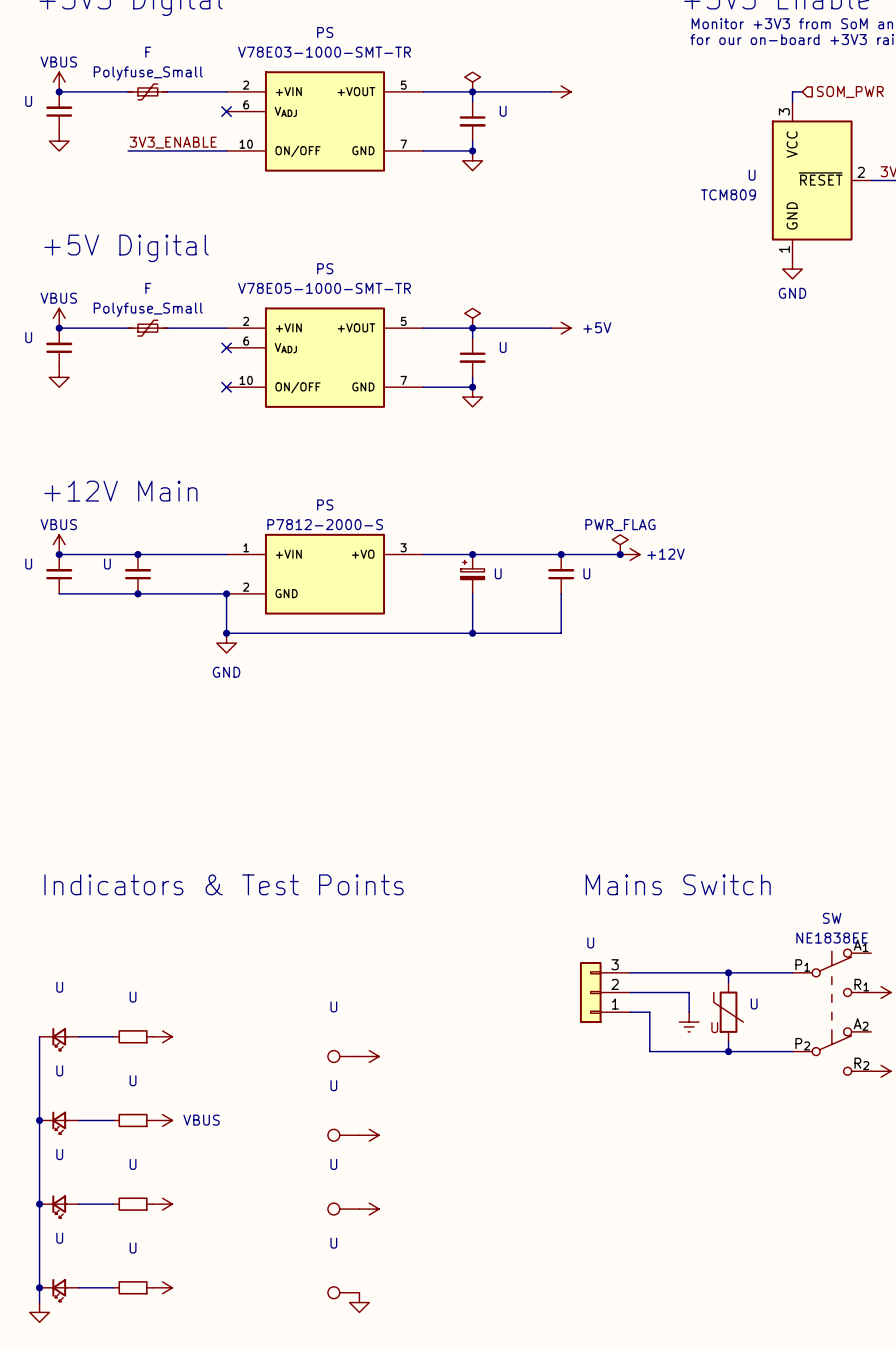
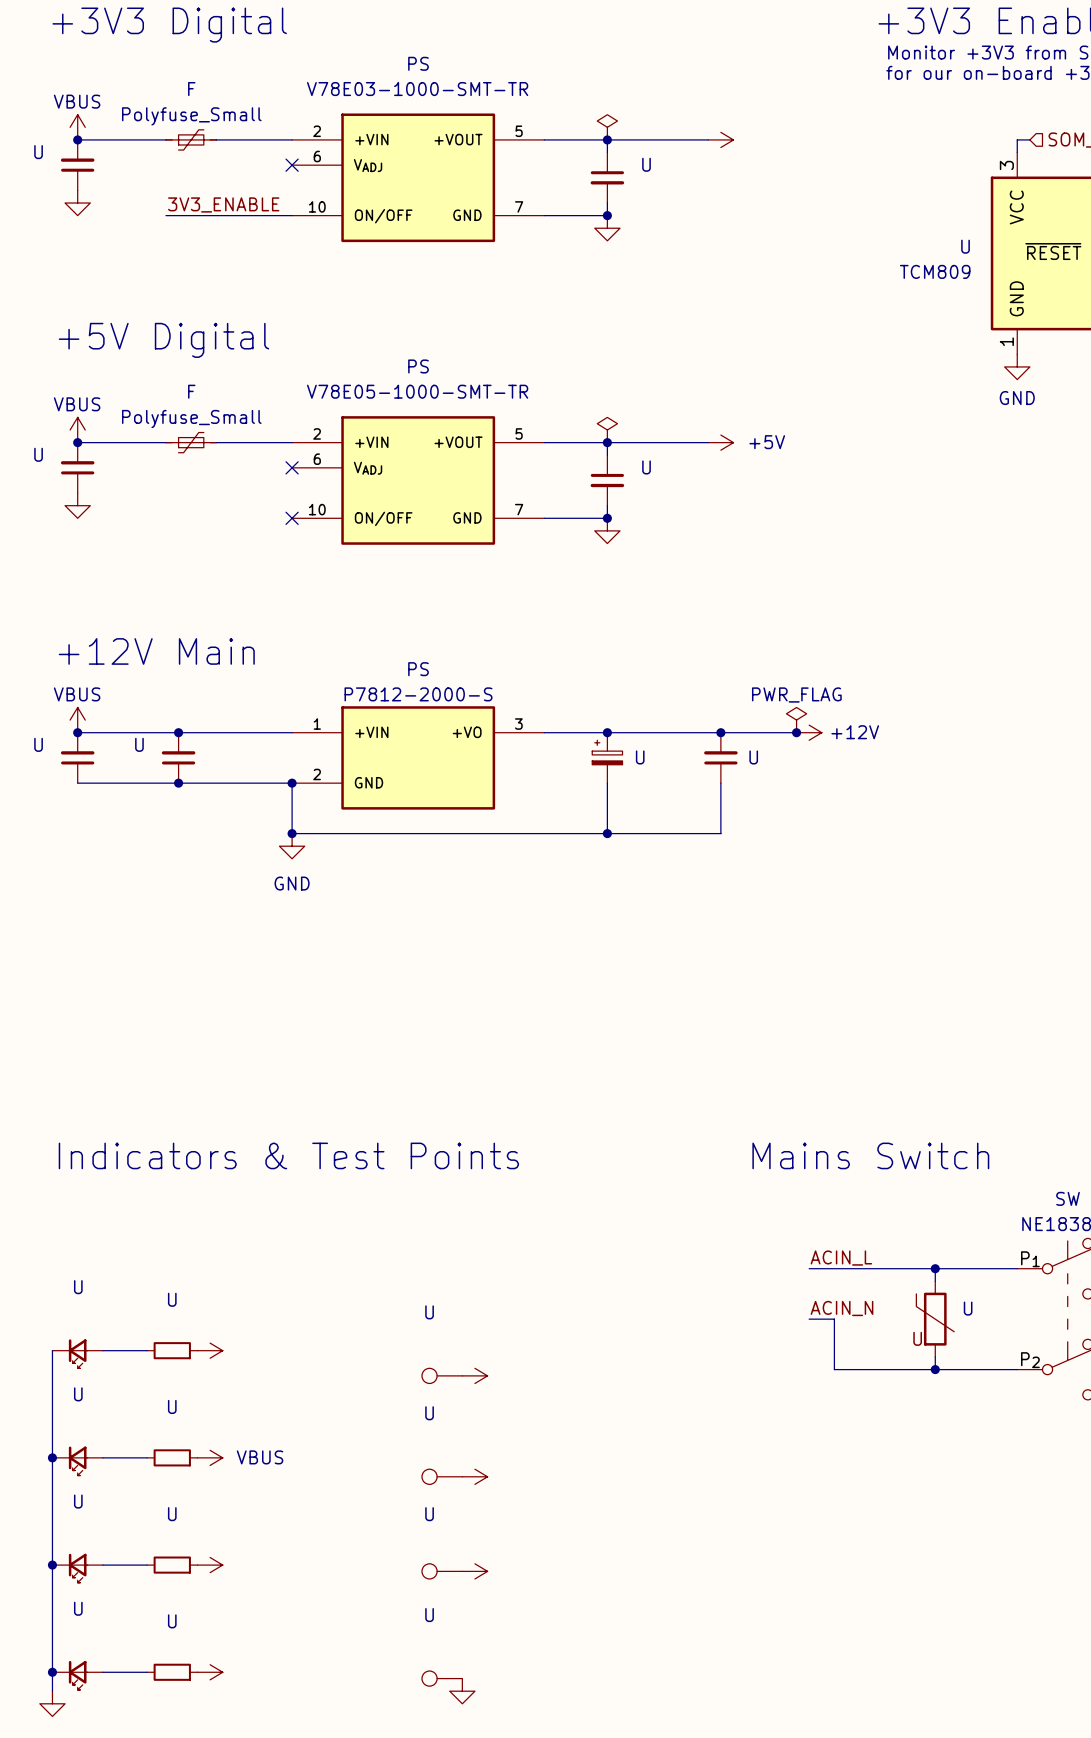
label: none -> ACIN_L (841, 1258)
U: (605, 992) -> none
wire: (630, 992) (689, 992) (689, 1012) -> none
label: none -> ACIN_N (841, 1308)
power symbol: (689, 1022) -> none

